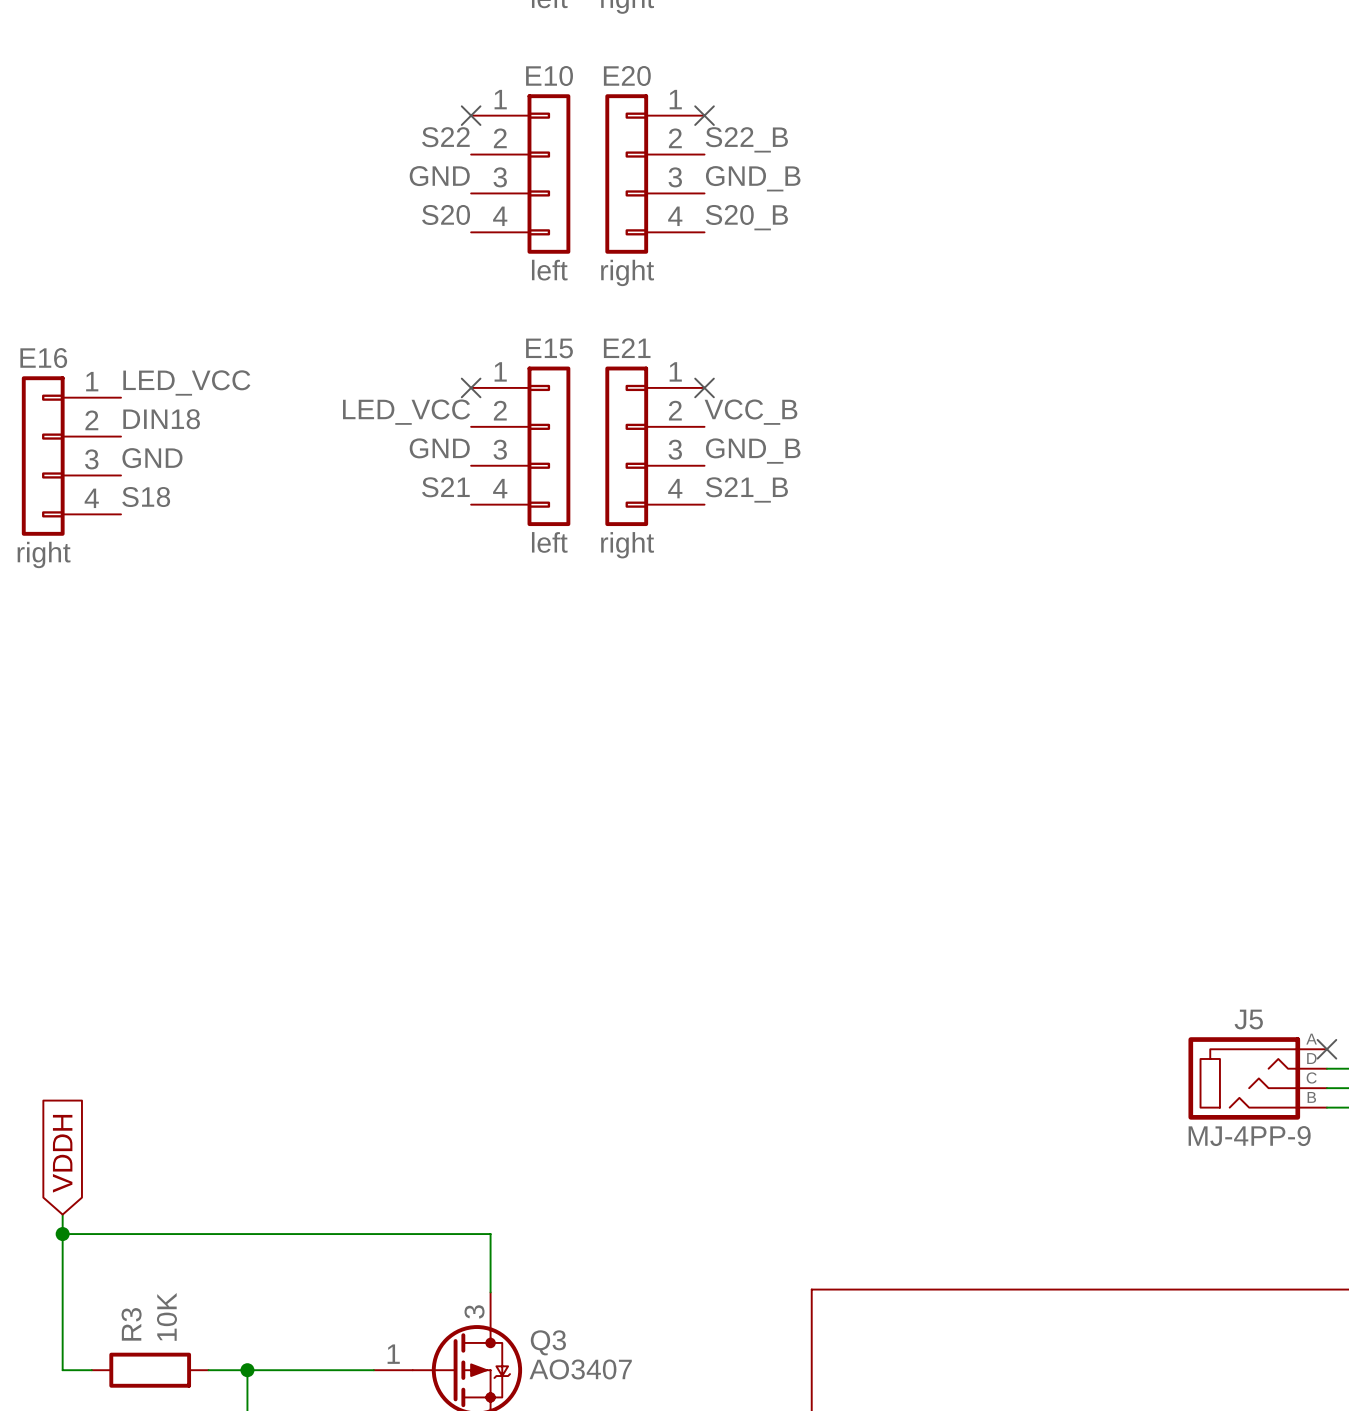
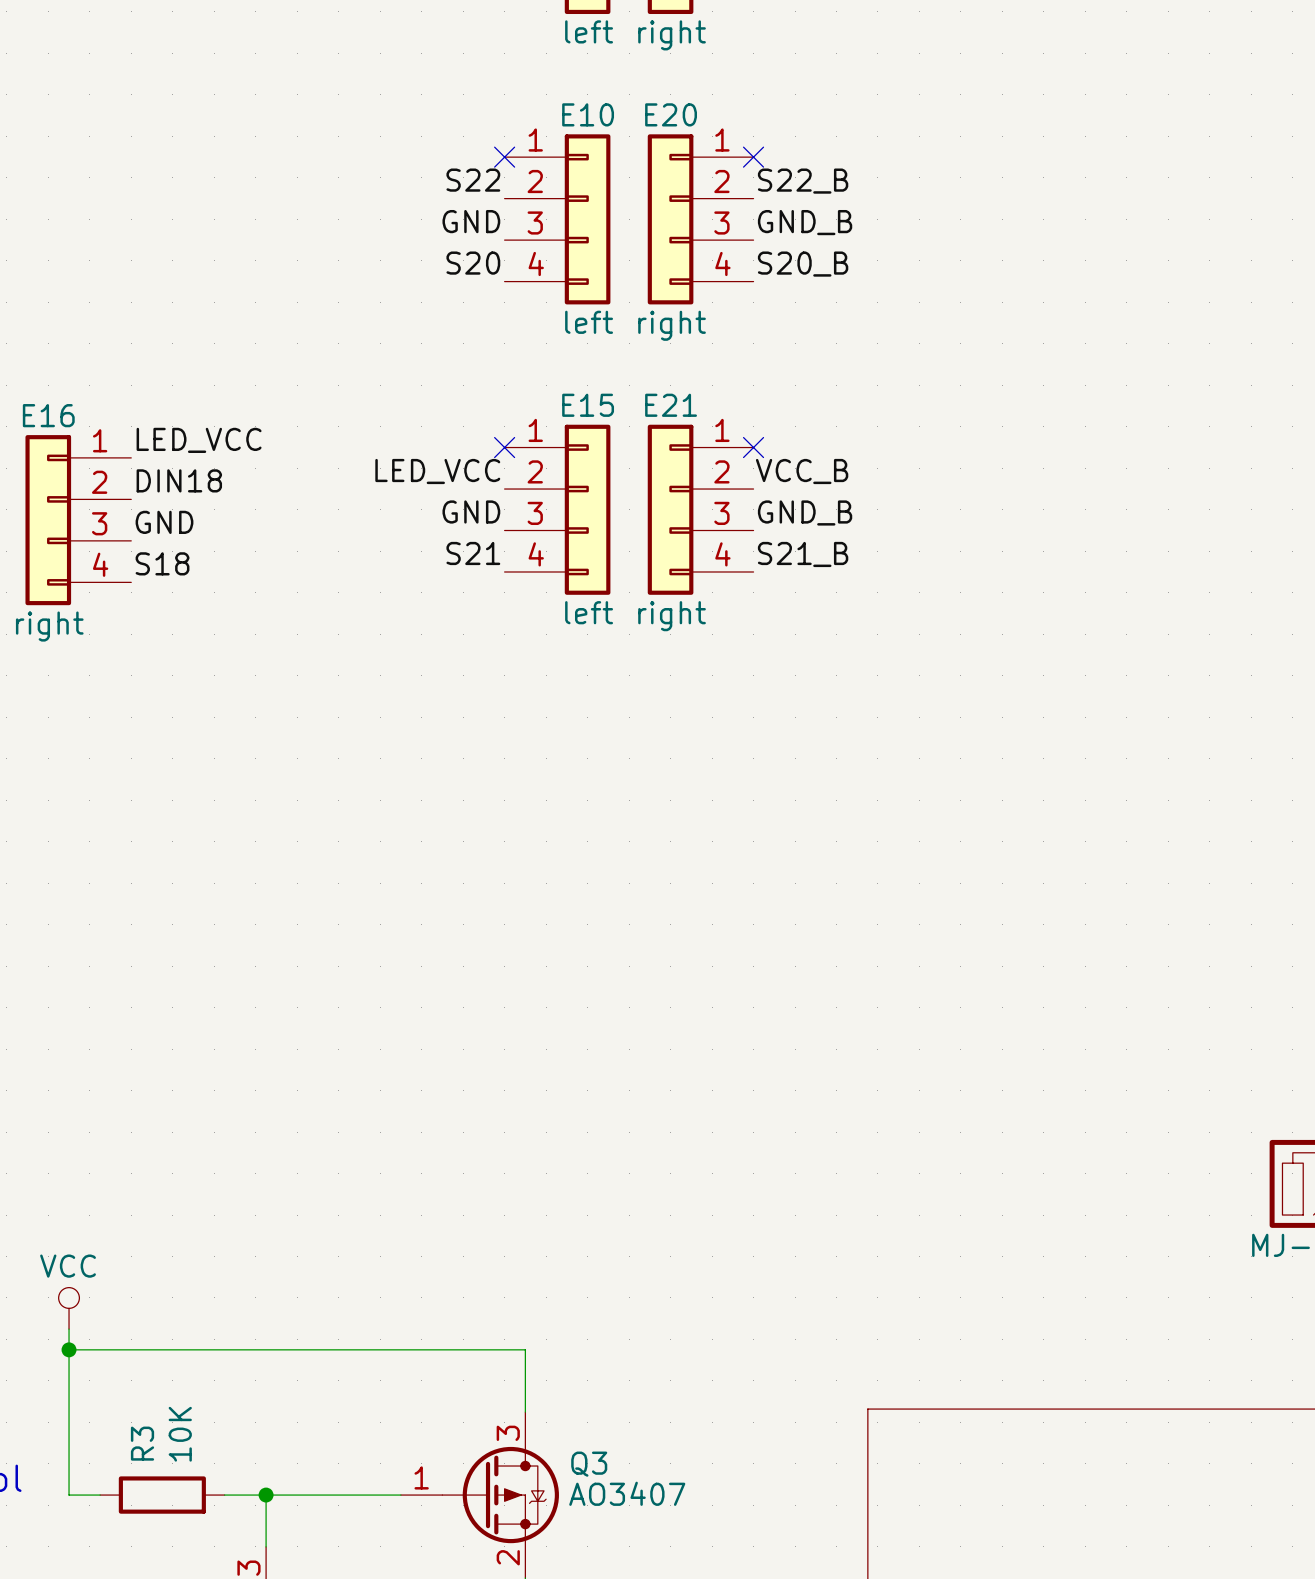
global label: VDDH (62, 1153) -> none
power symbol: none -> VCC (69, 1308)

